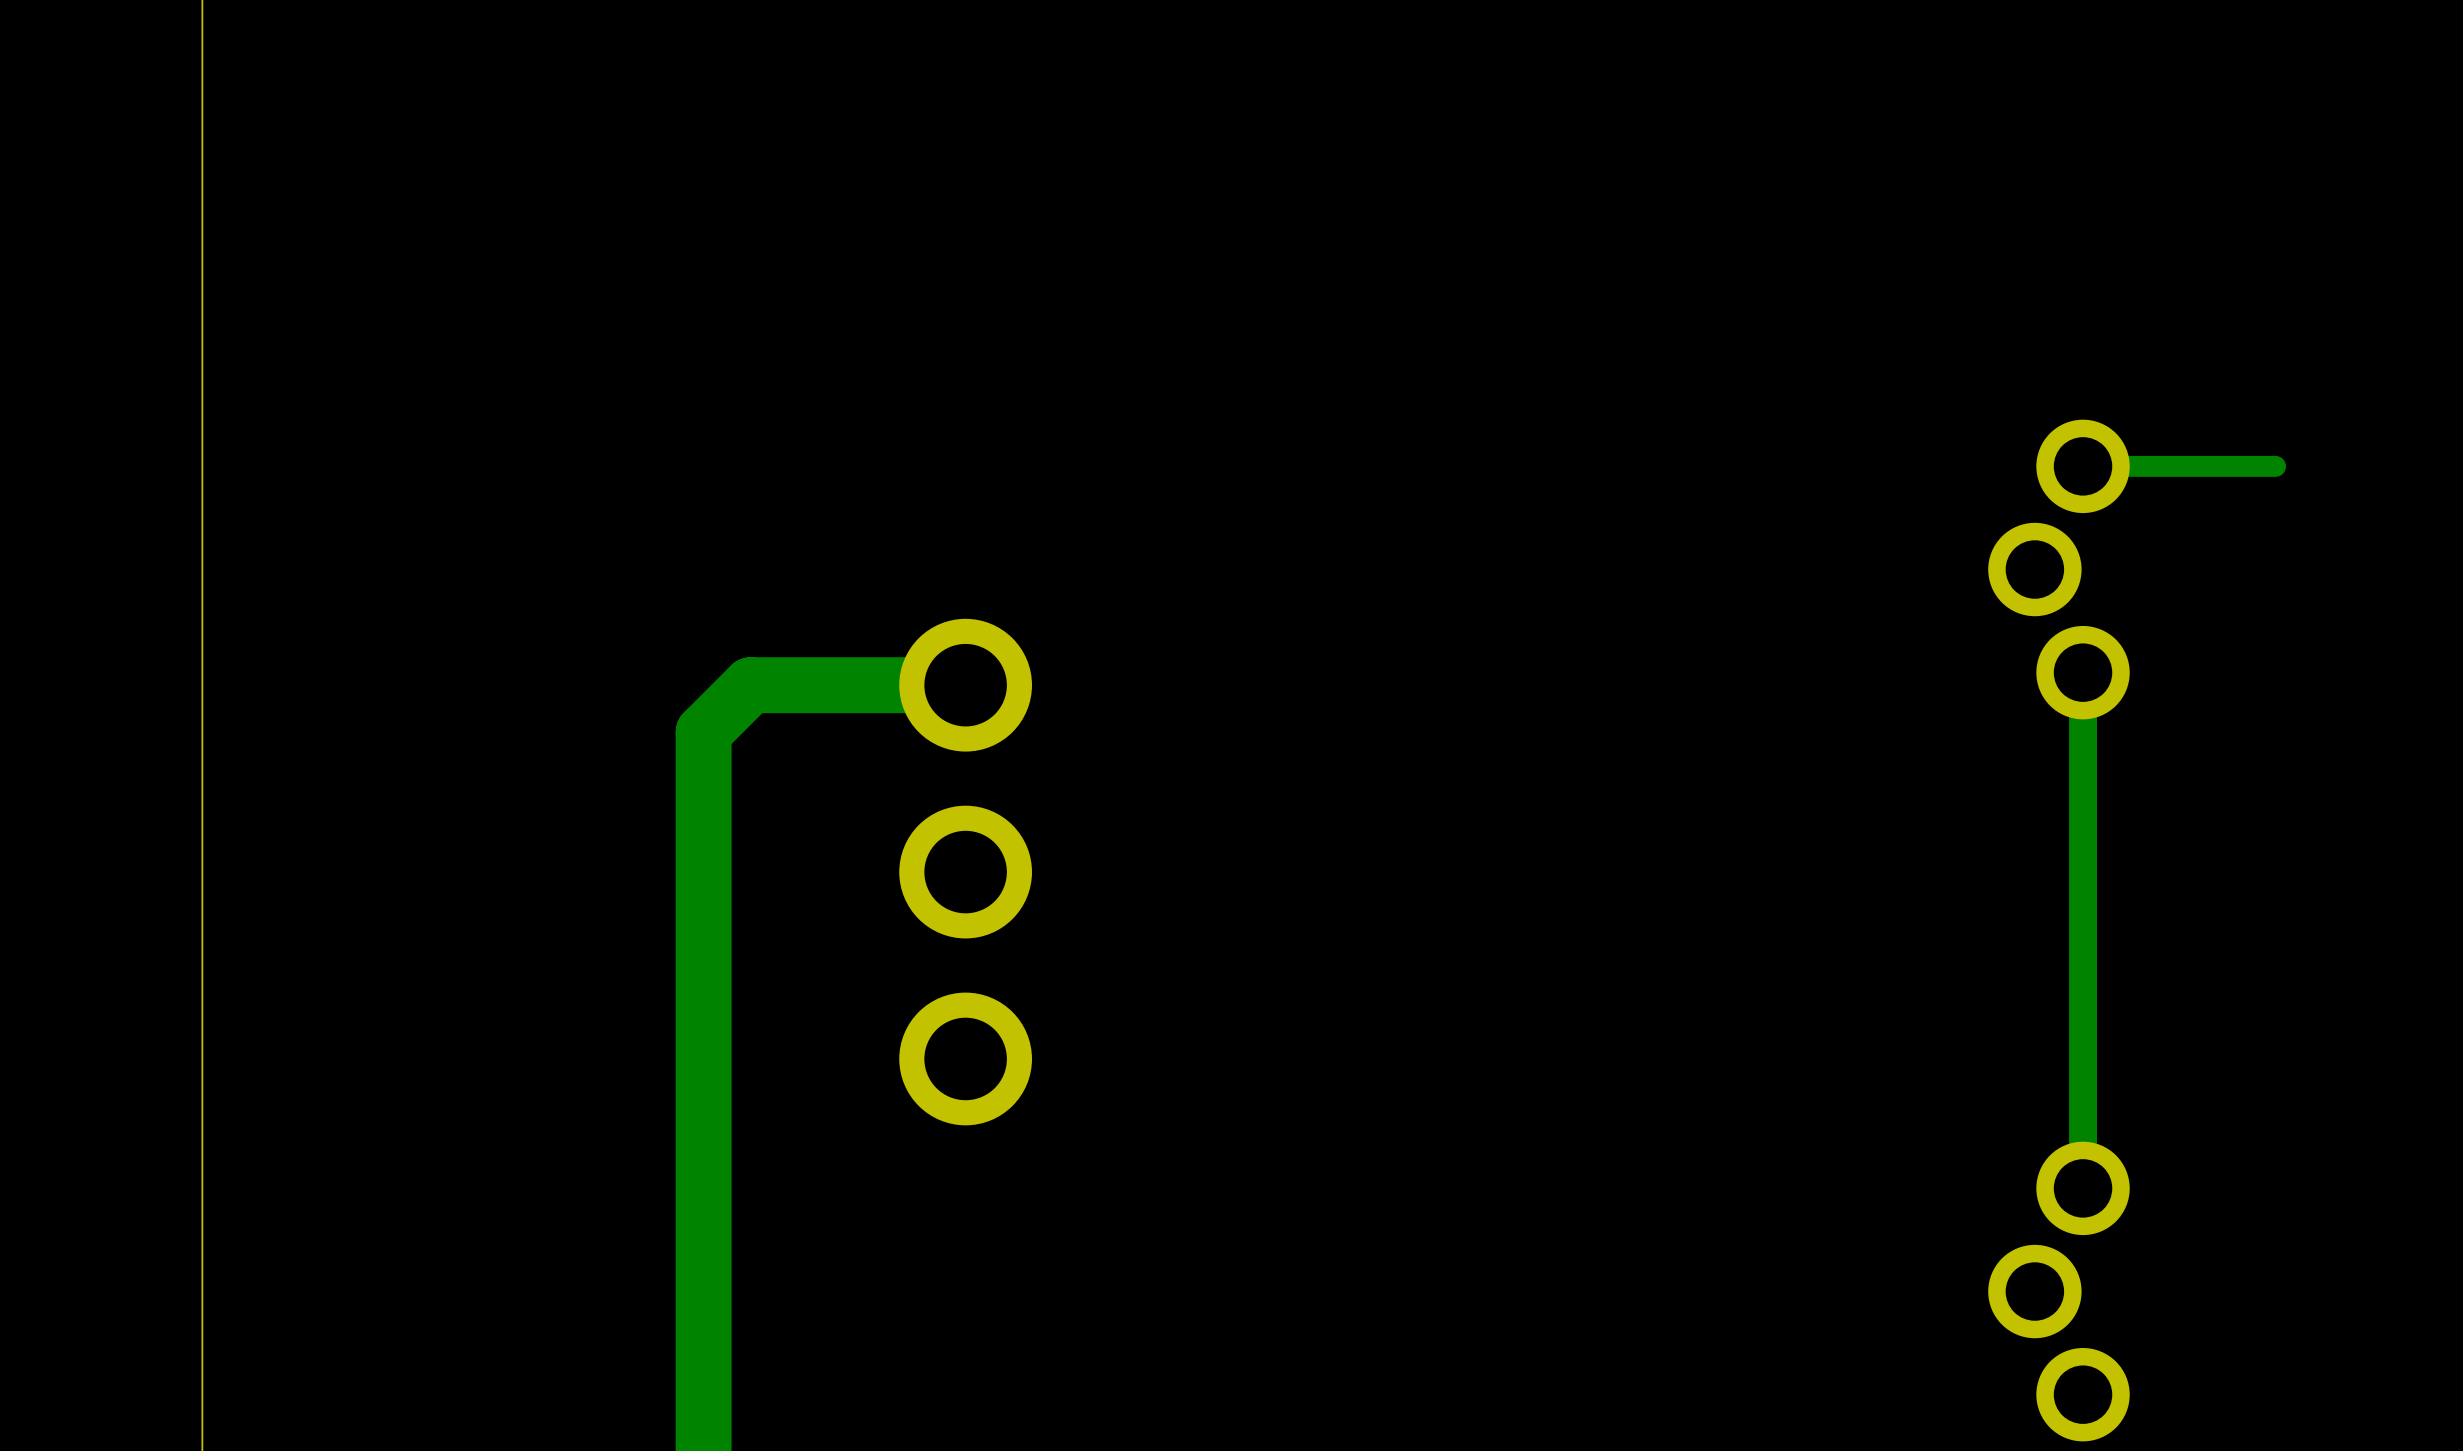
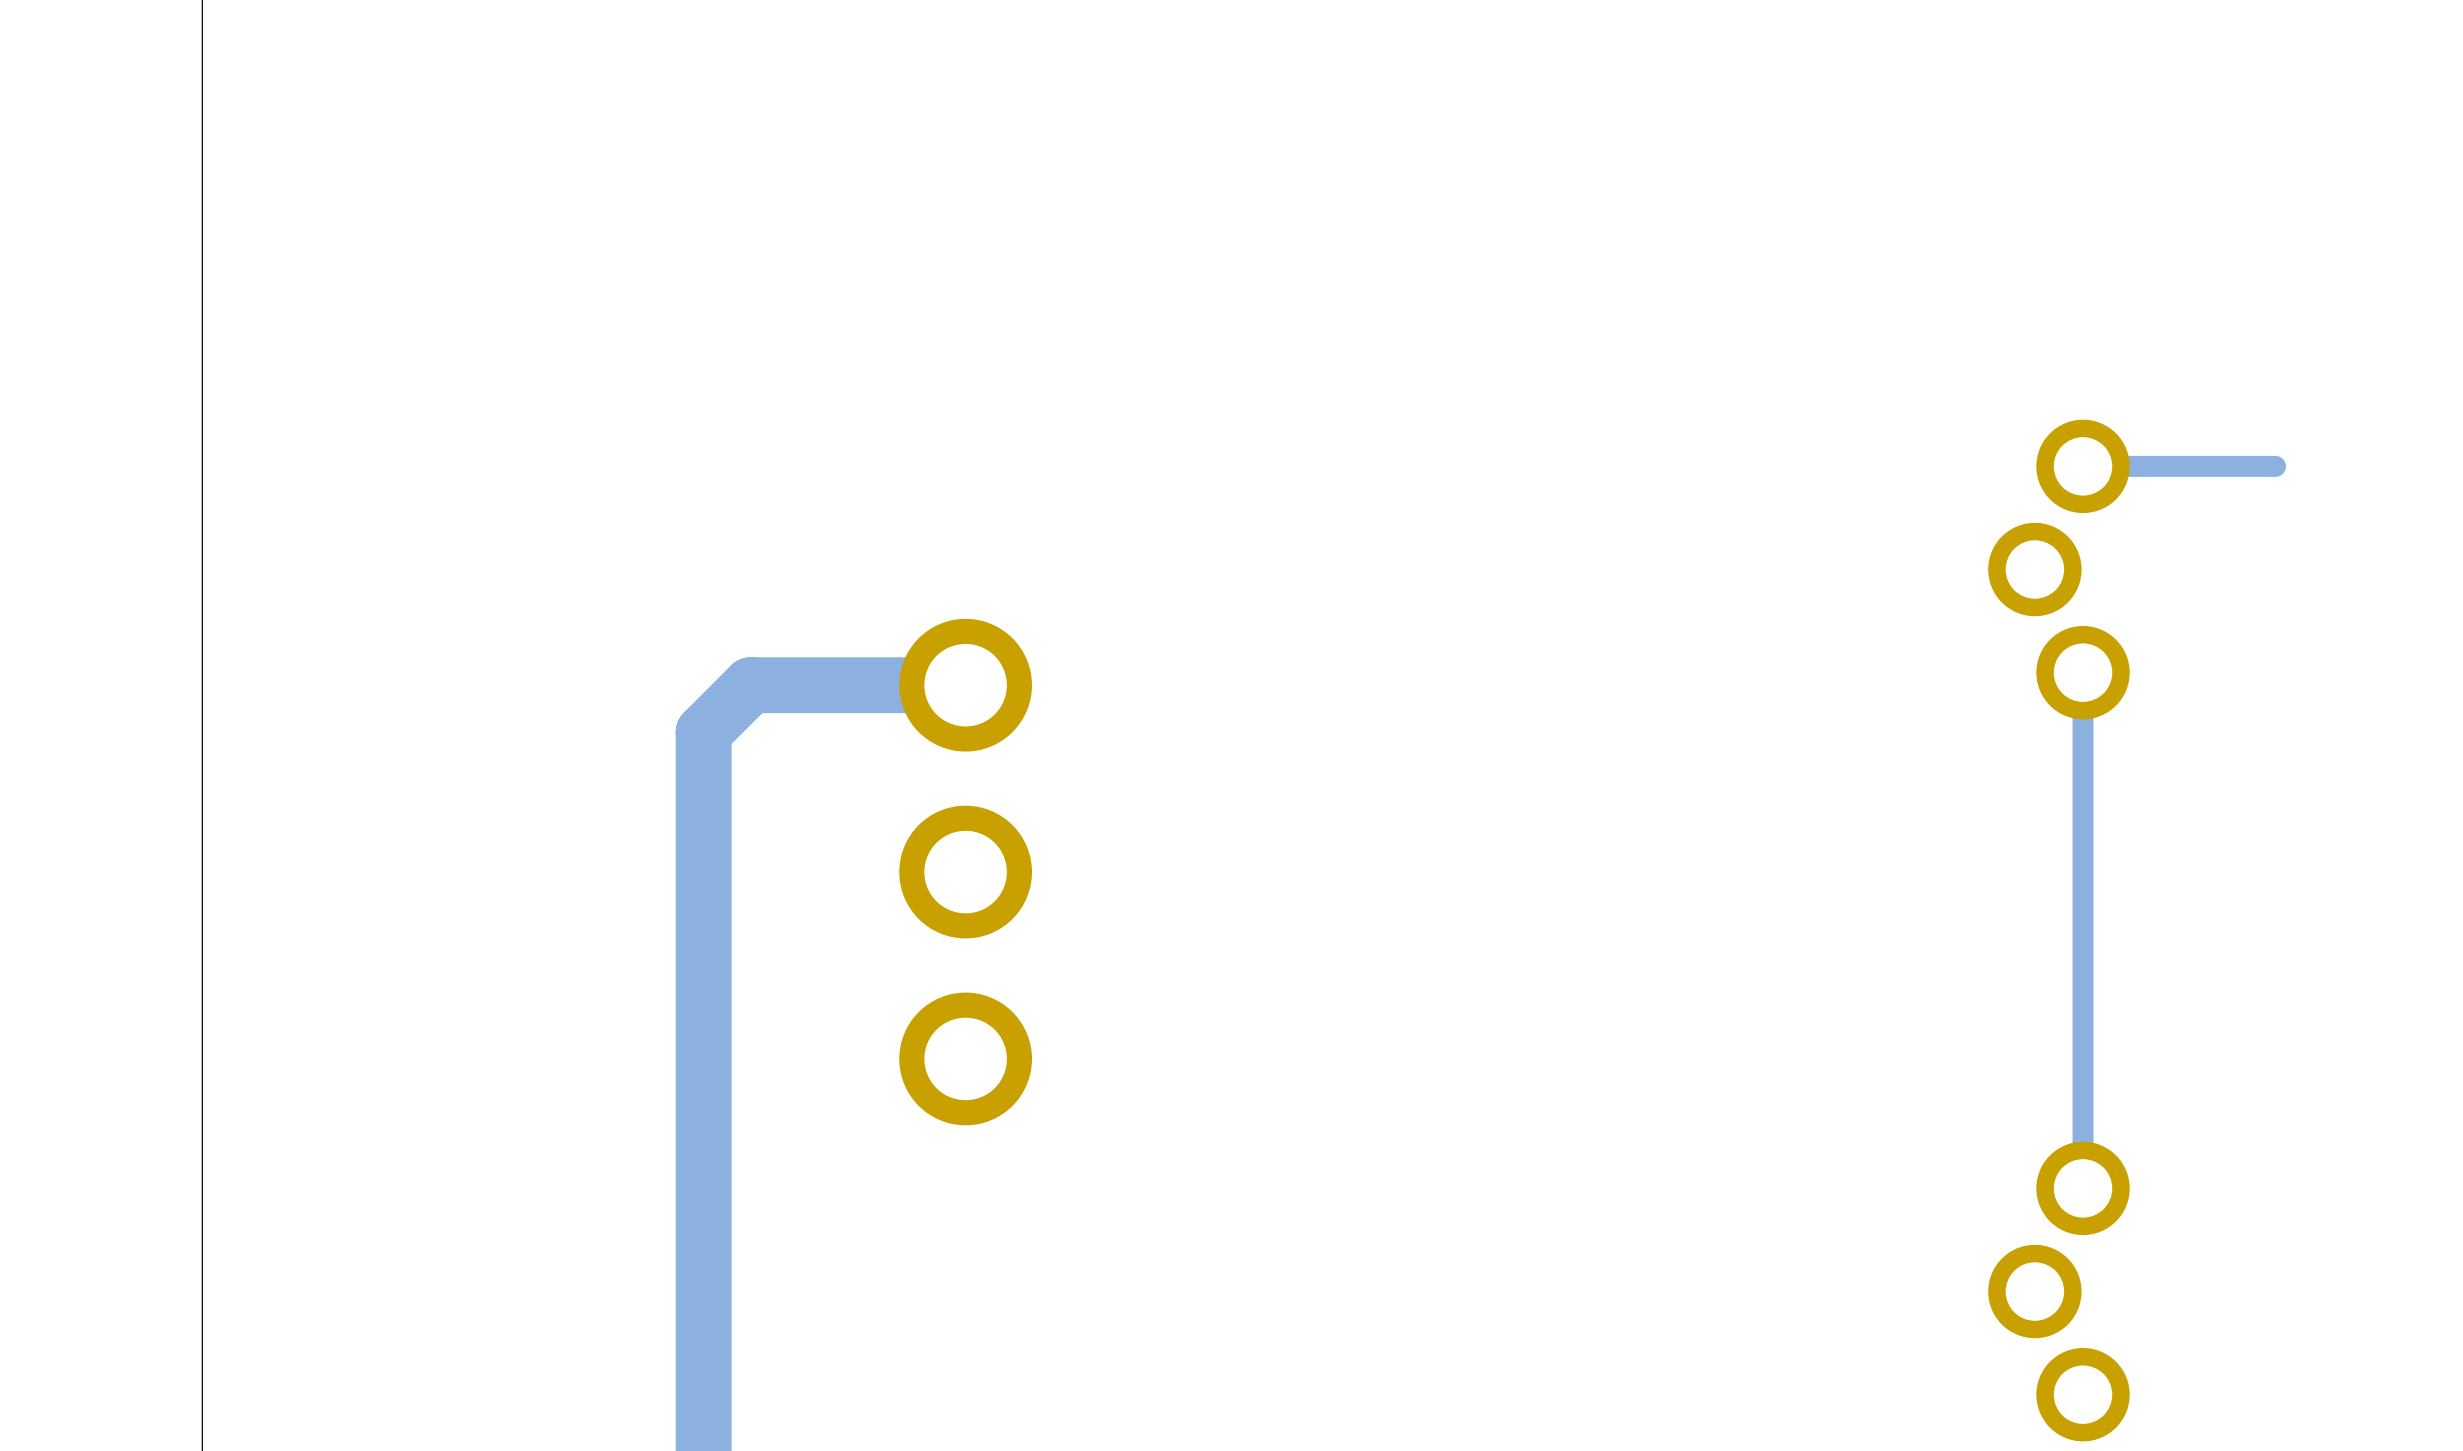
track width: thick (2083, 672) (2083, 1188) -> thin (2083, 672) (2083, 1188)

